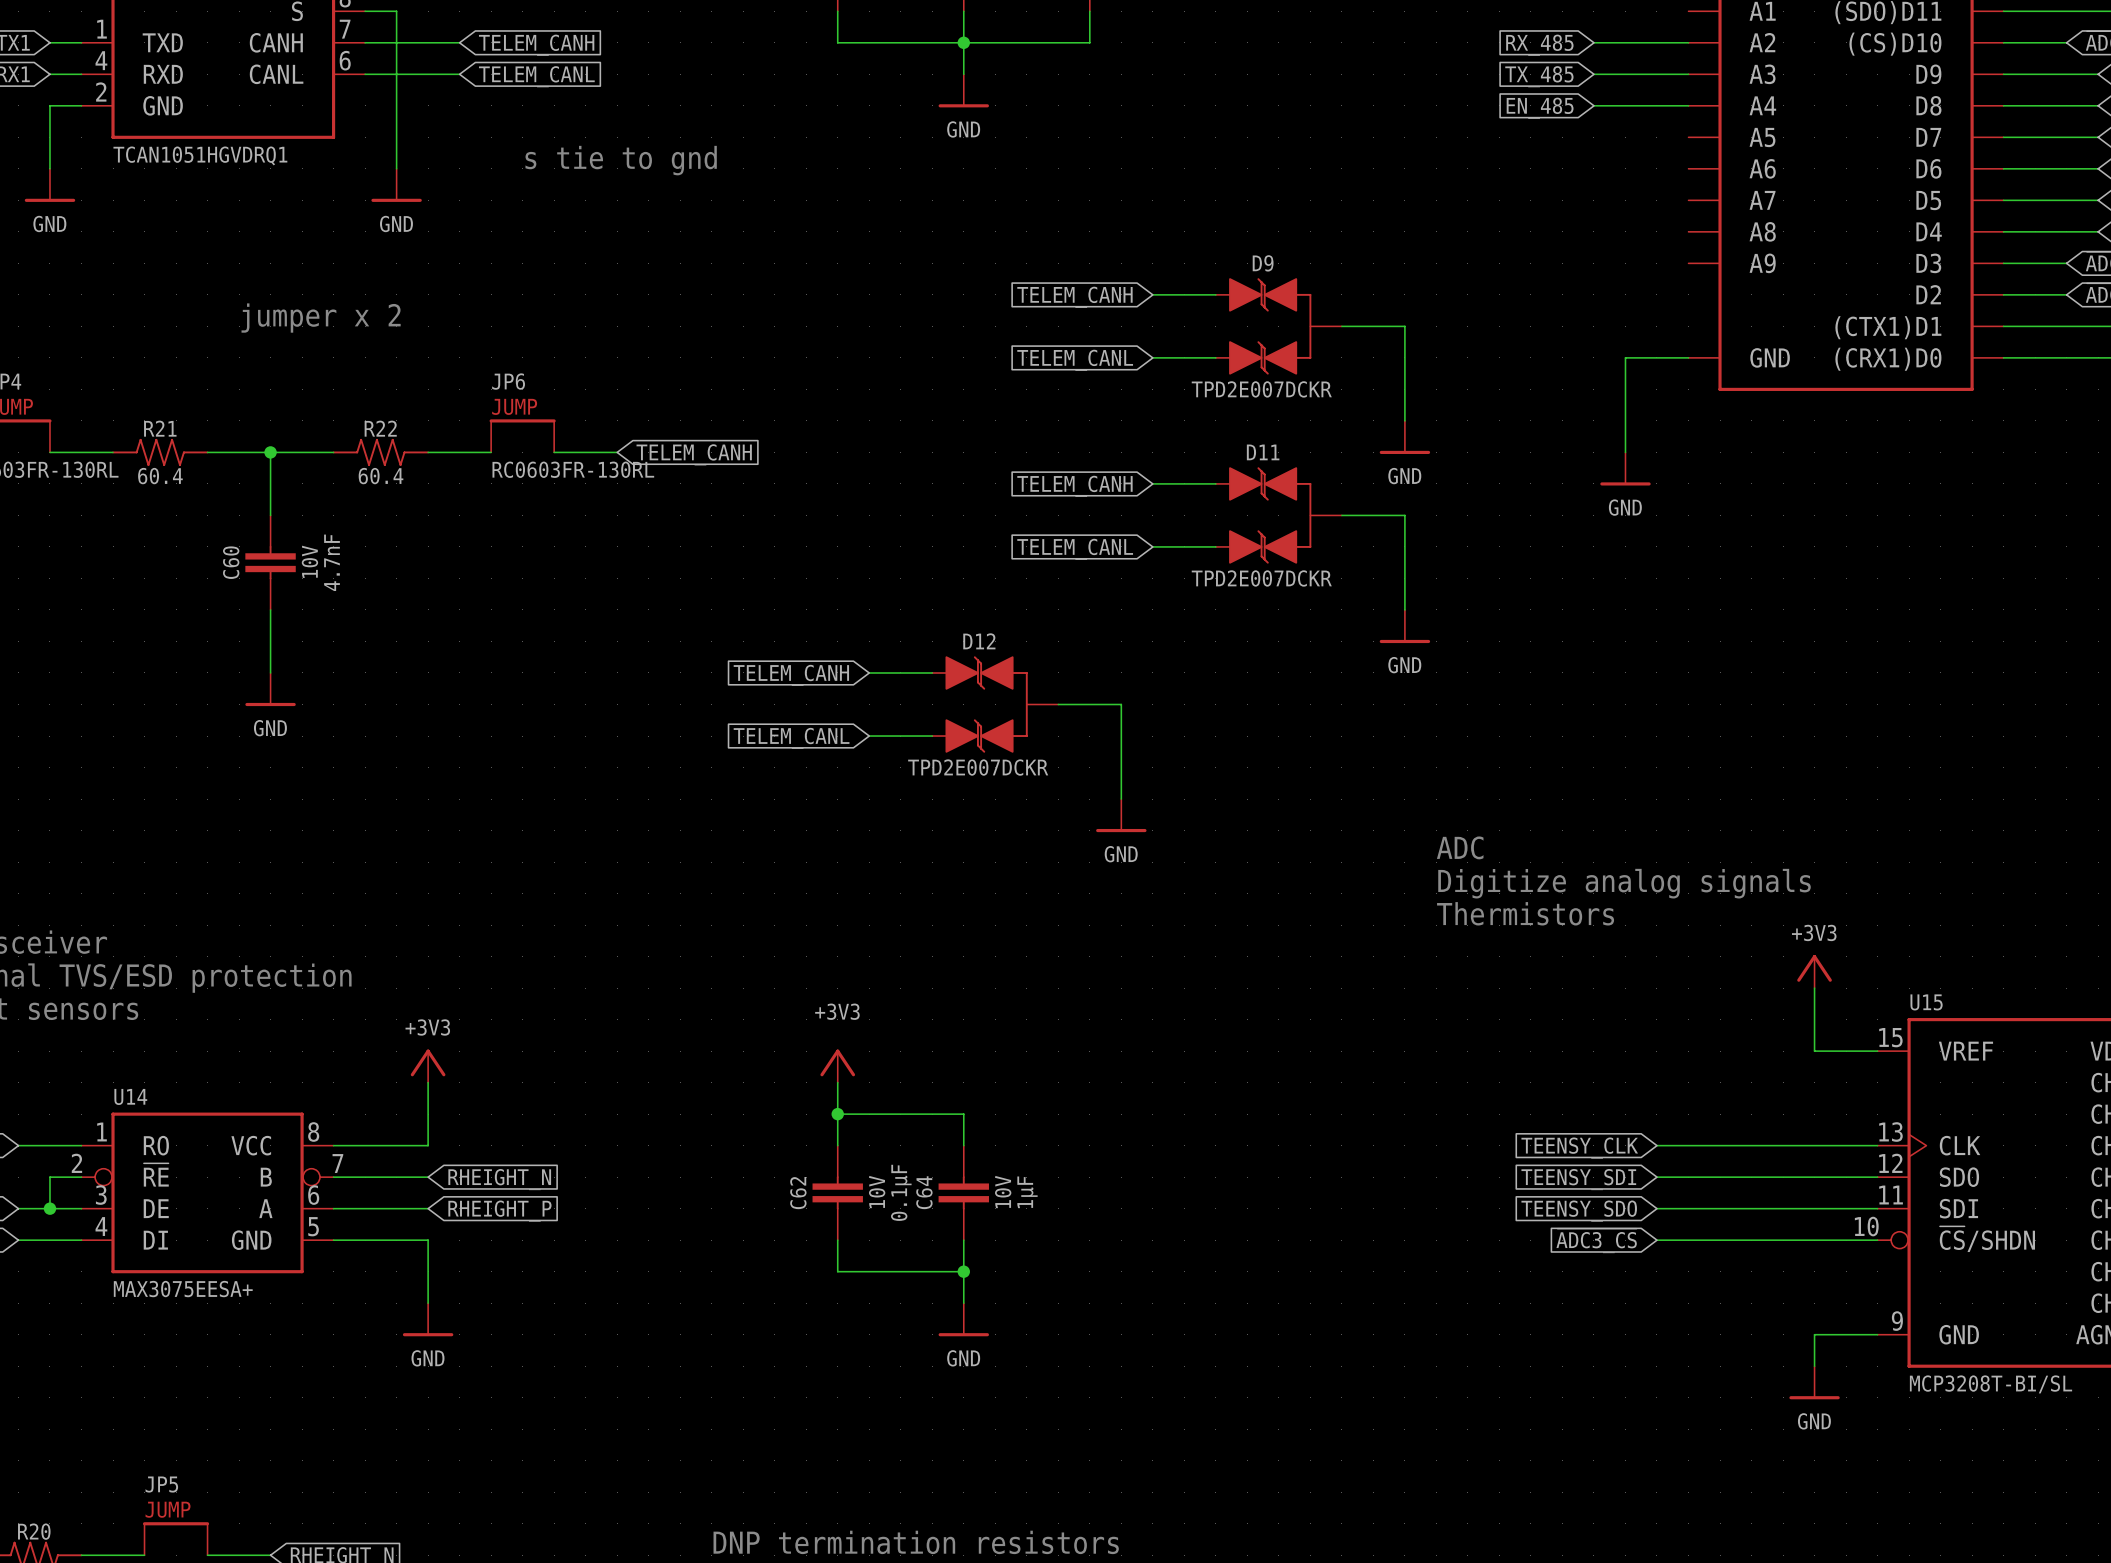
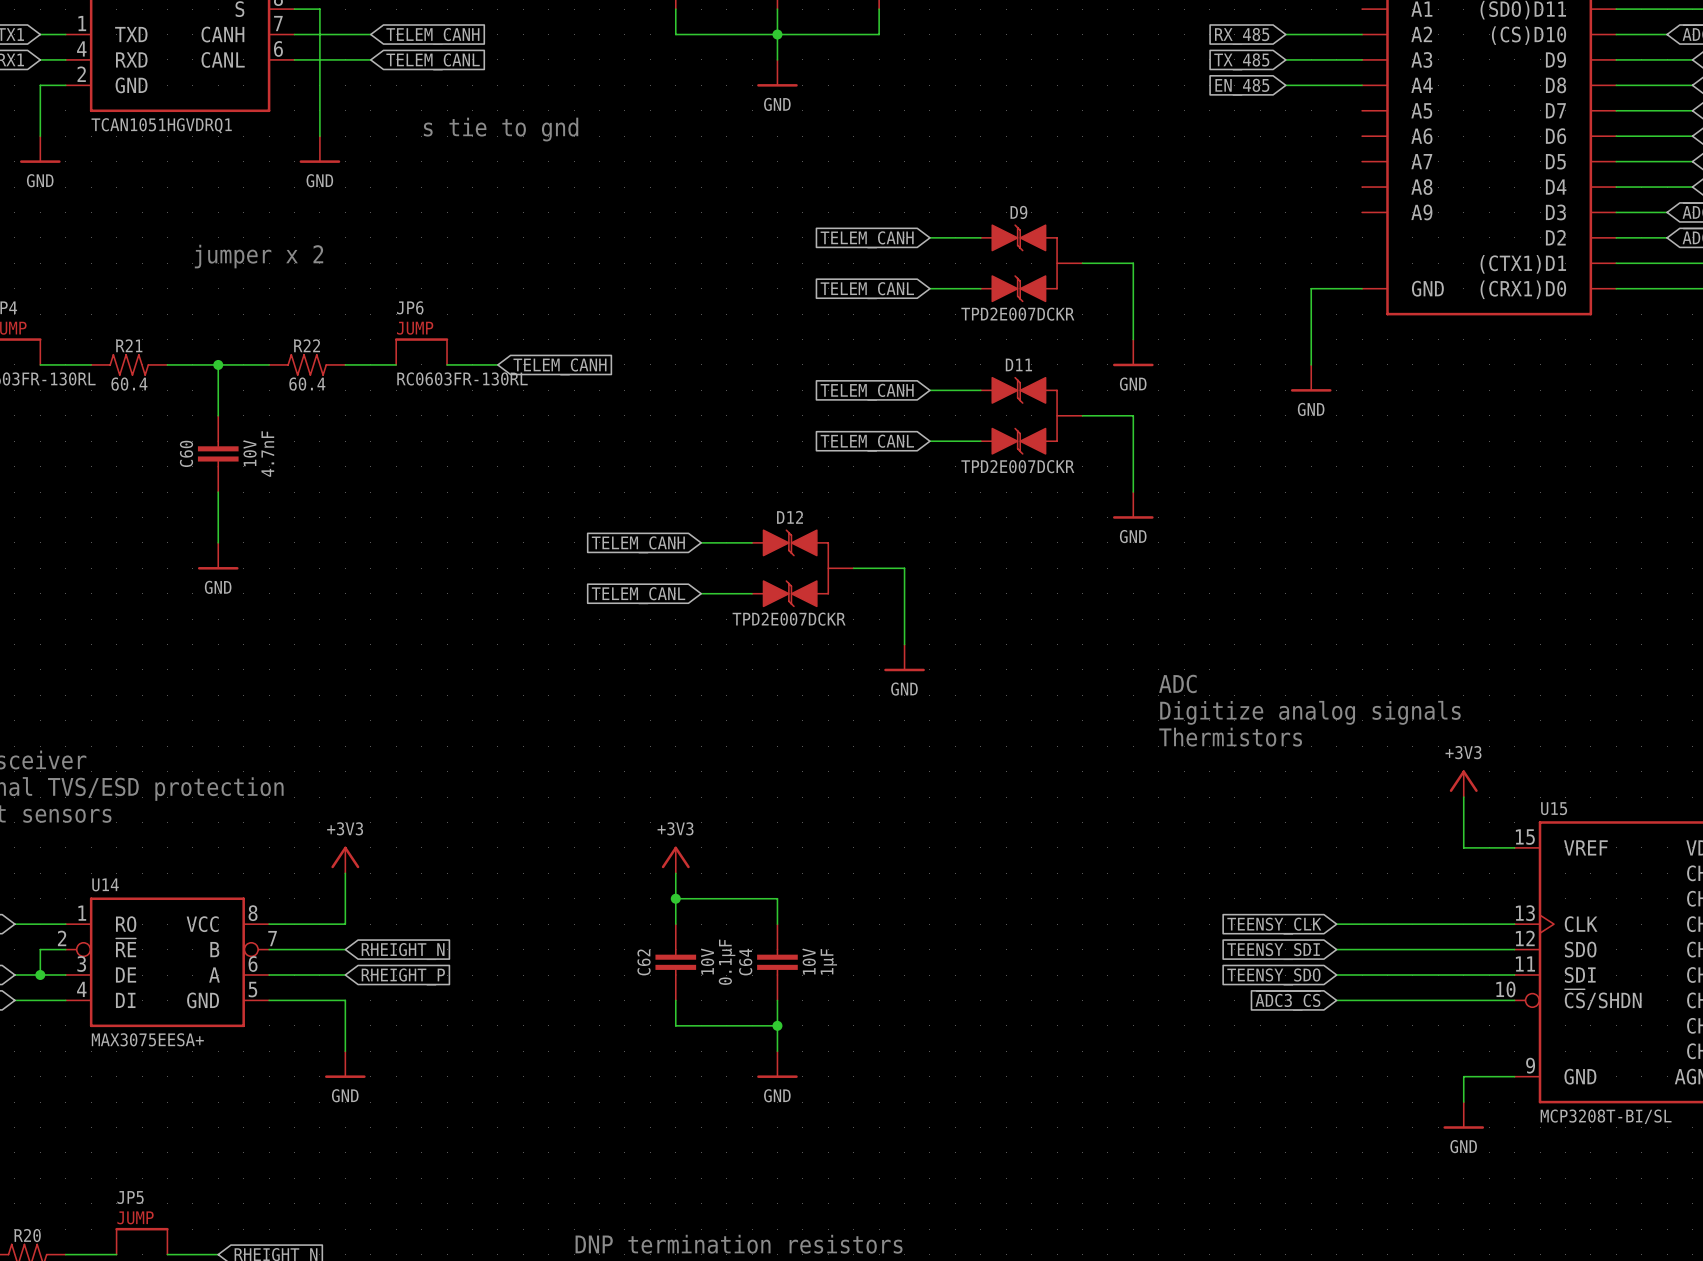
power symbol text position: +3V3 (837, 1011) -> +3V3 (675, 828)

